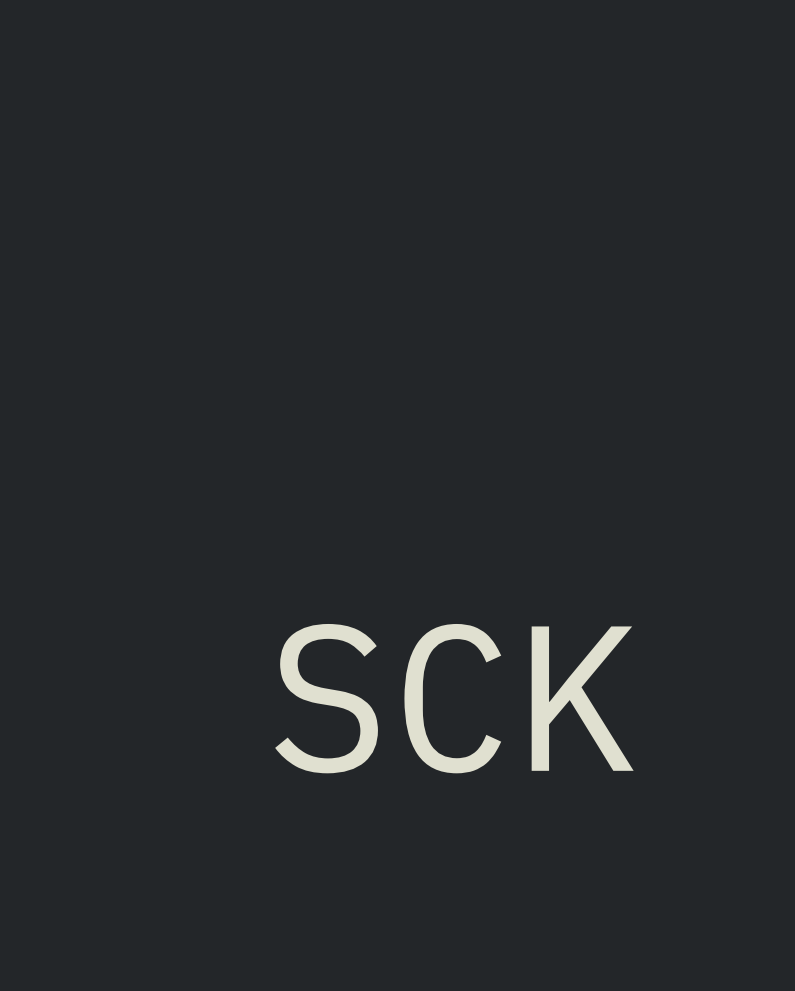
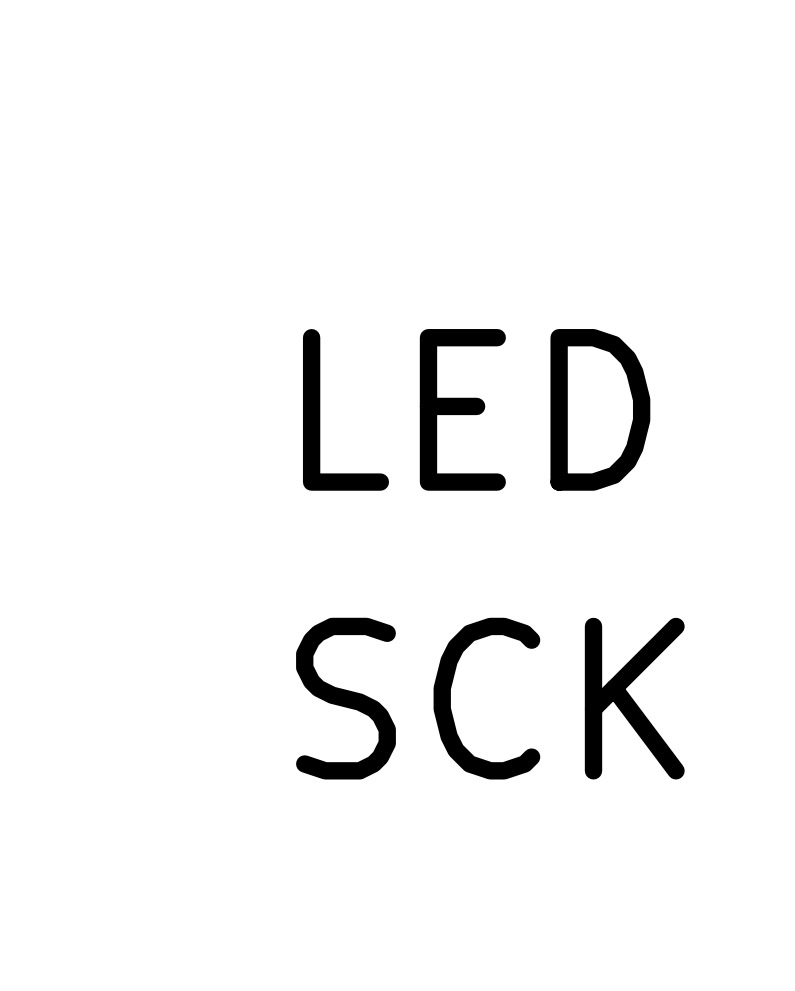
label: none -> LED (476, 409)

